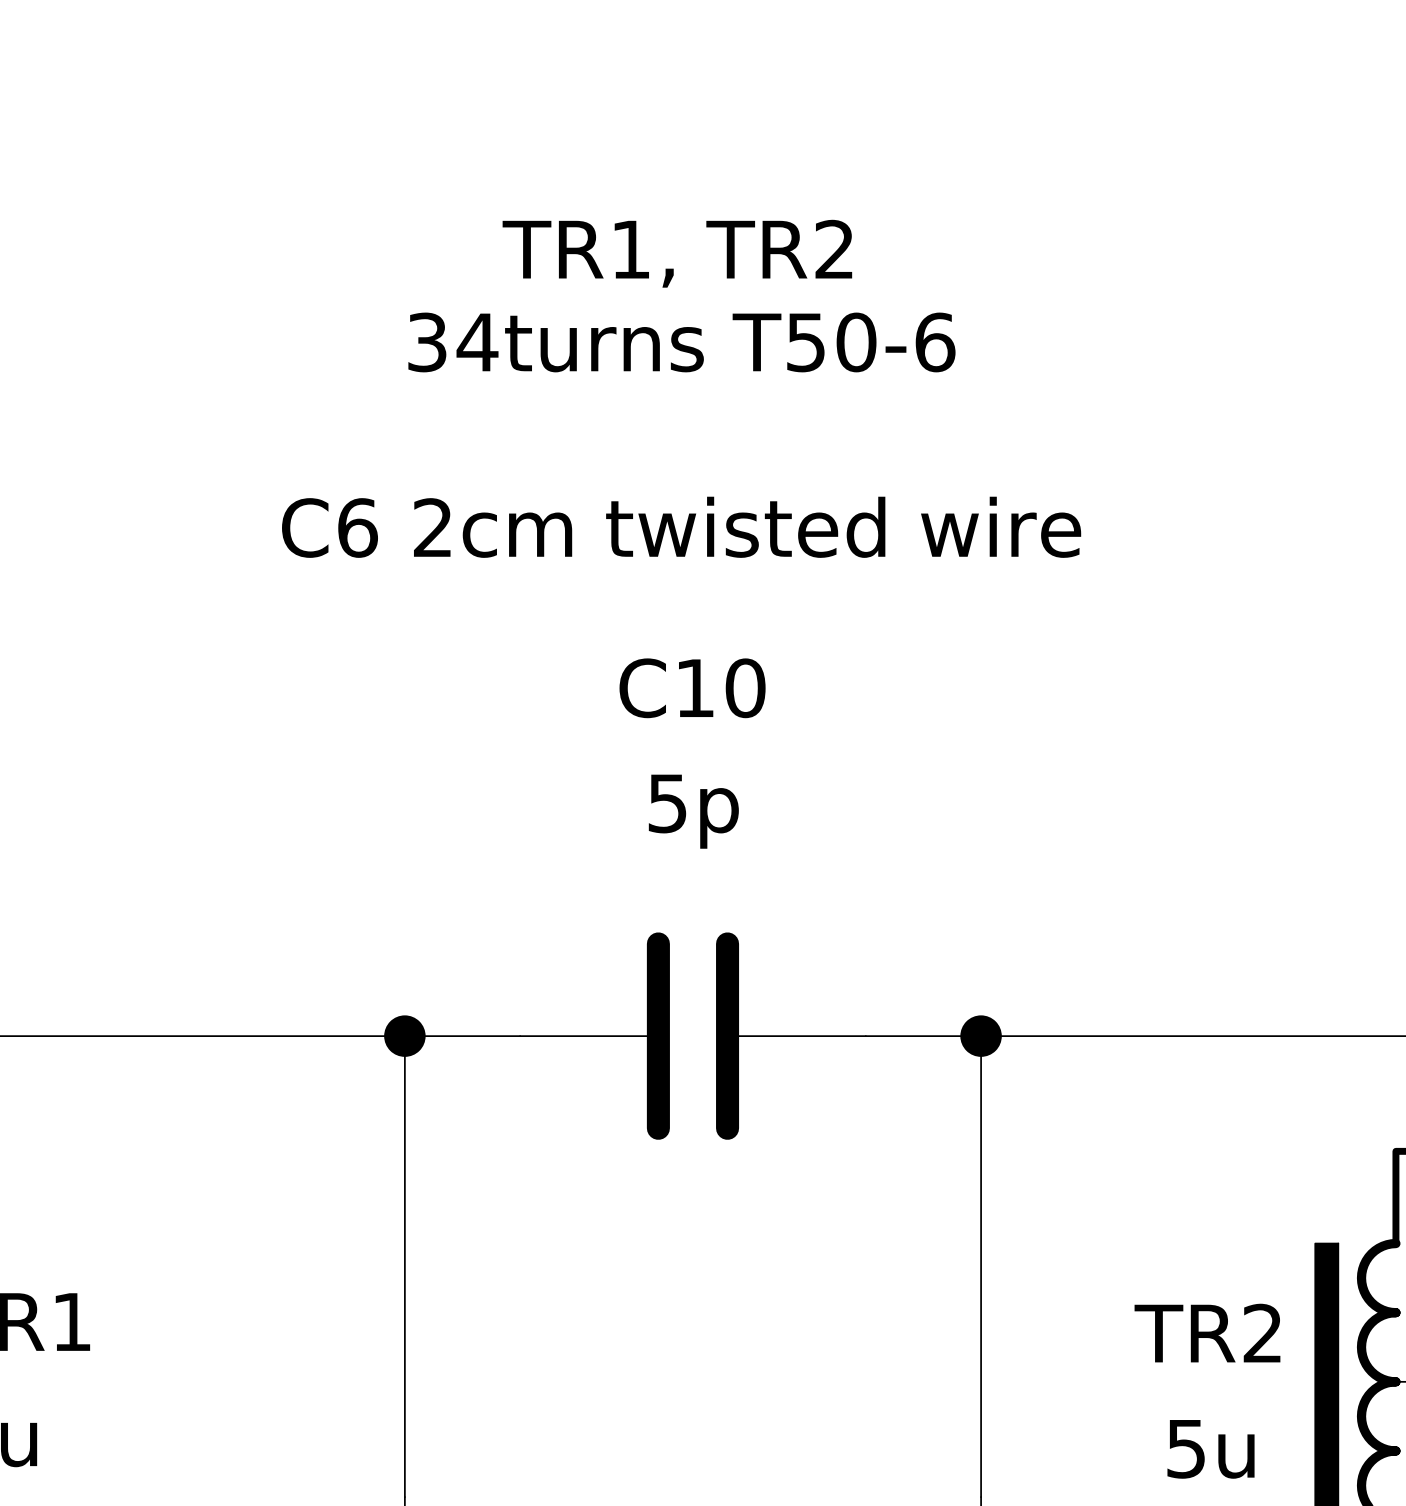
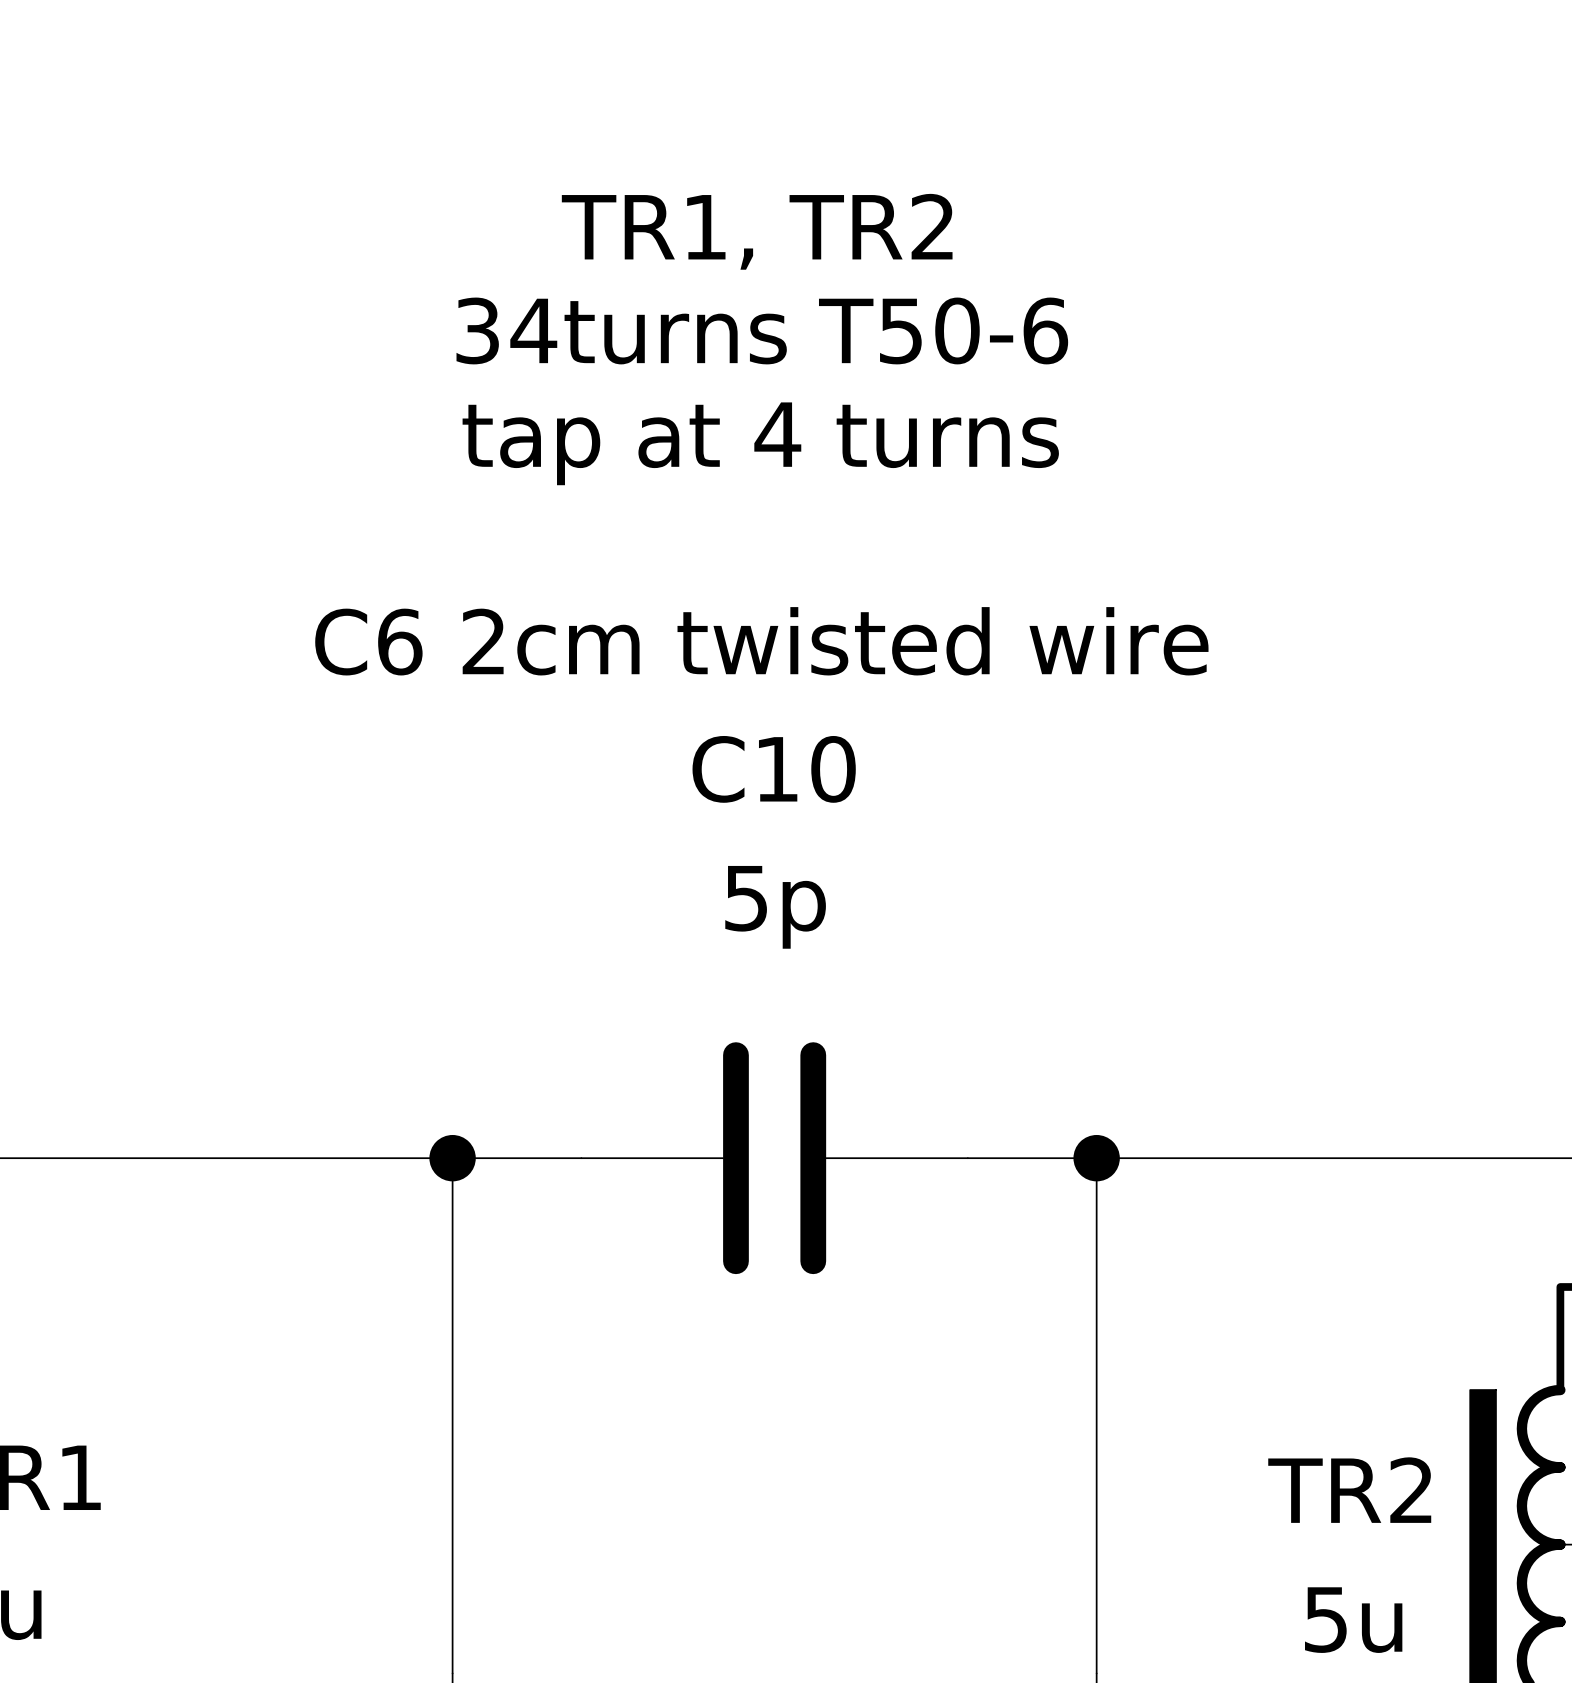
text position: TR1, TR2 (677, 253) -> TR1, TR2 (757, 231)
text position: 34turns T50-6 (681, 342) -> 34turns T50-6 (762, 330)
text: none -> tap at 4 turns (760, 443)
text position: C6 2cm twisted wire (681, 527) -> C6 2cm twisted wire (761, 641)

